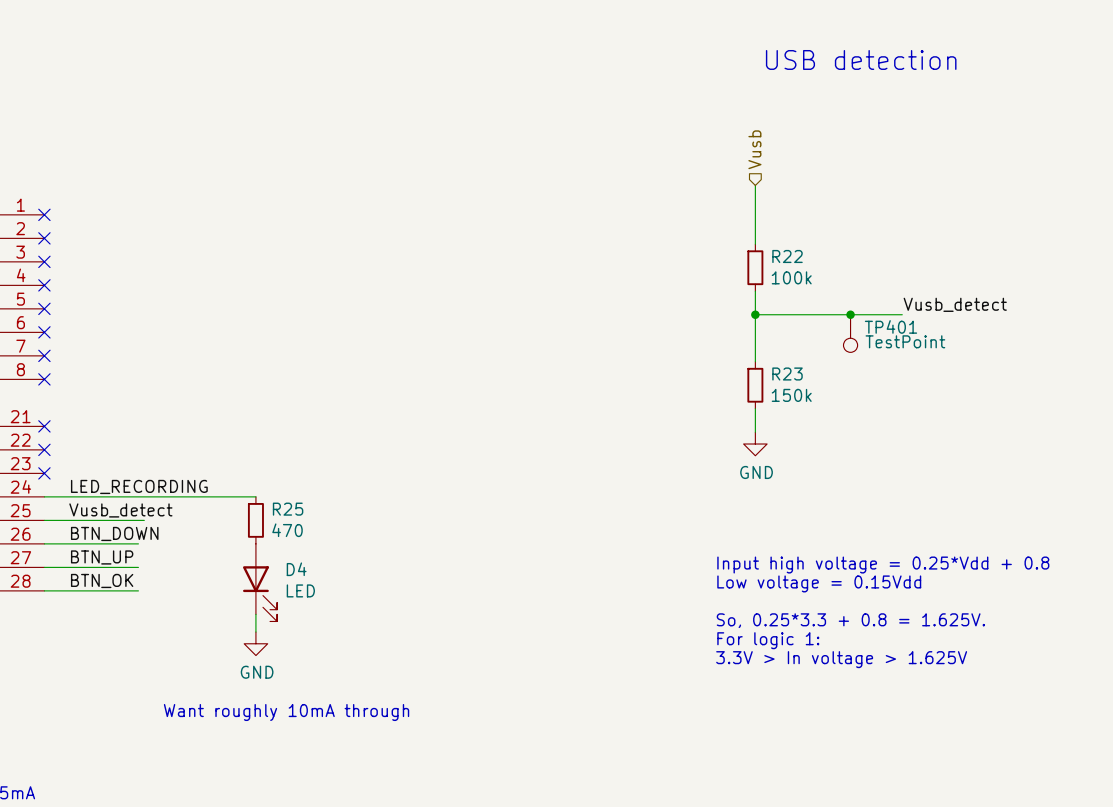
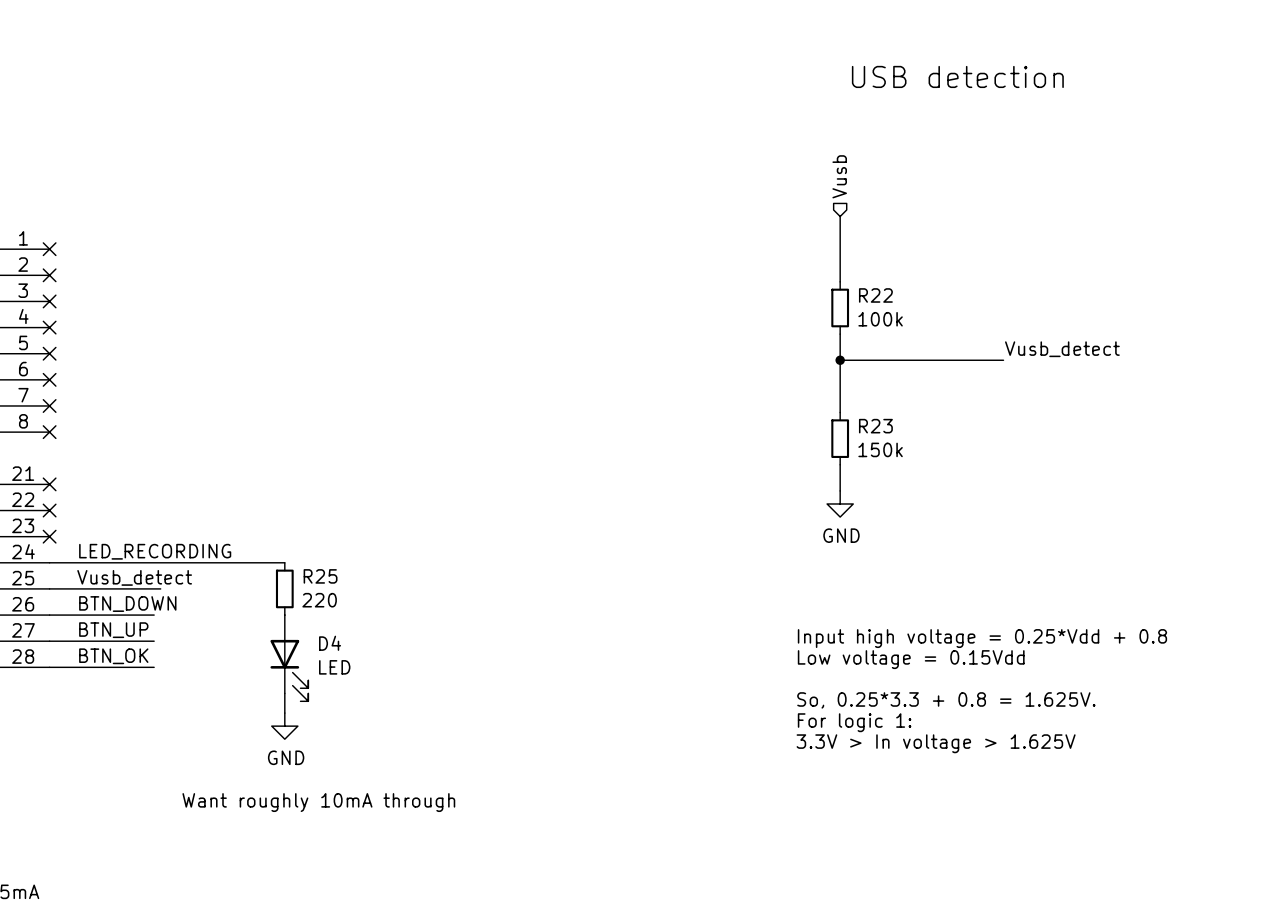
junction: (850, 314) -> none
TP401: TestPoint (850, 333) -> none
R25 value: 470 (287, 530) -> 220 (319, 600)

